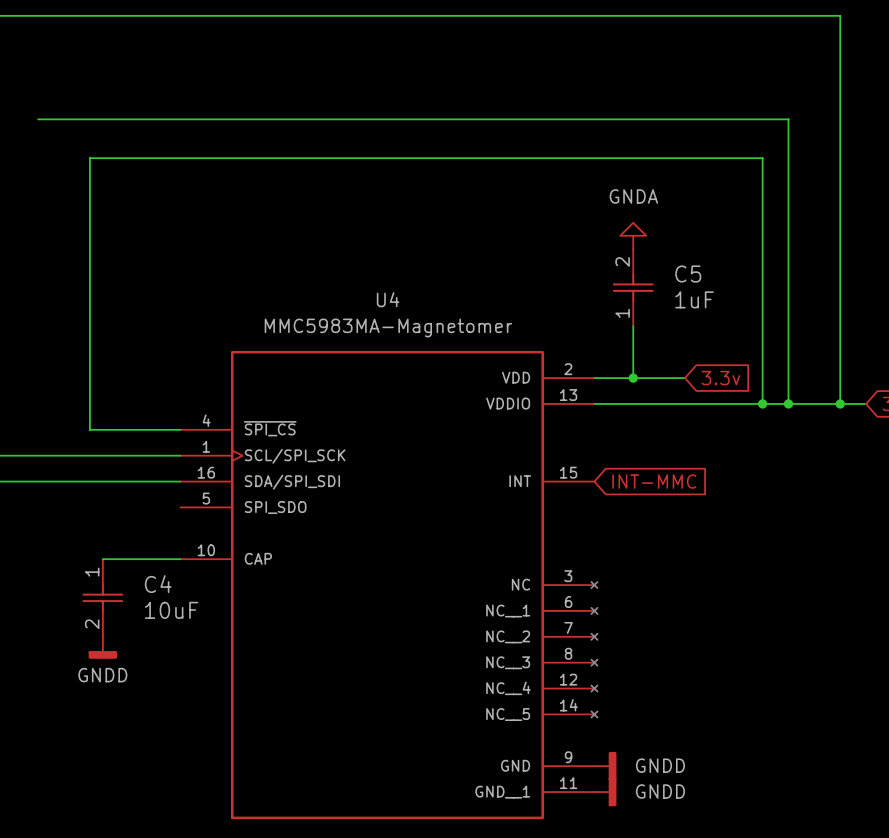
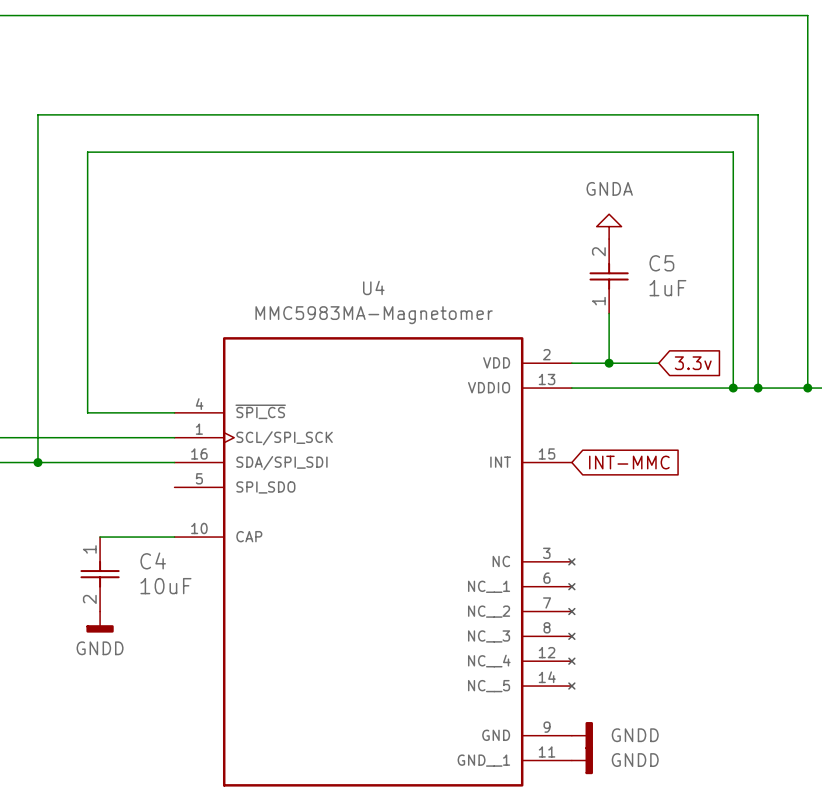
wire: none -> (37, 114) (37, 462)
junction: none -> (37, 462)

